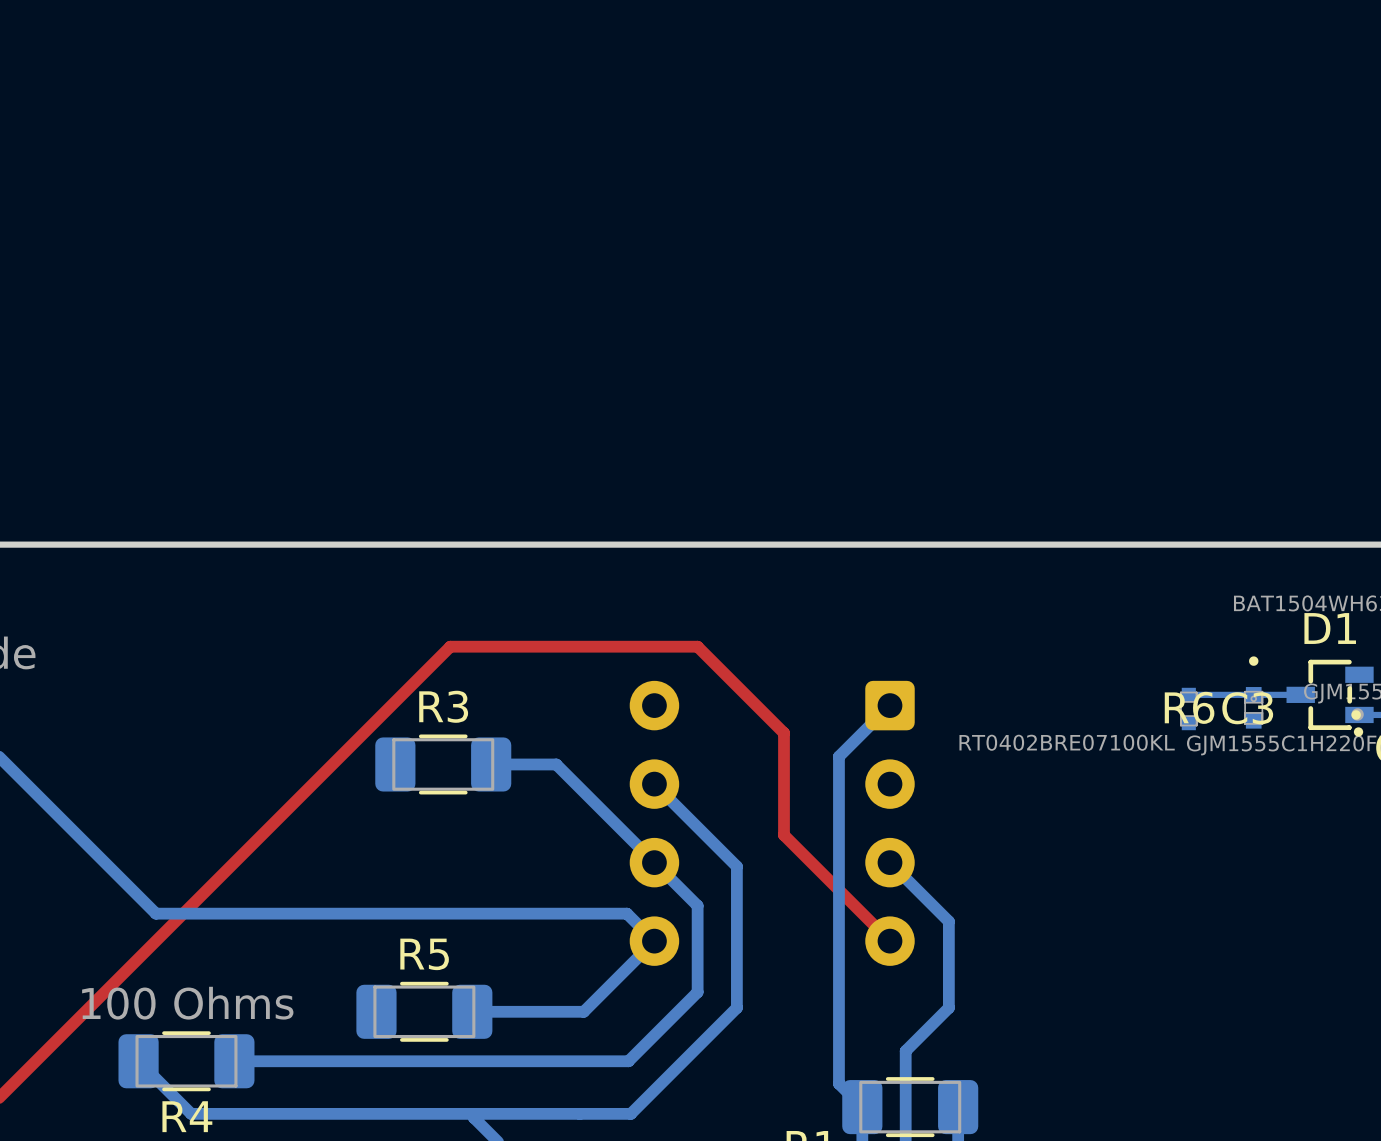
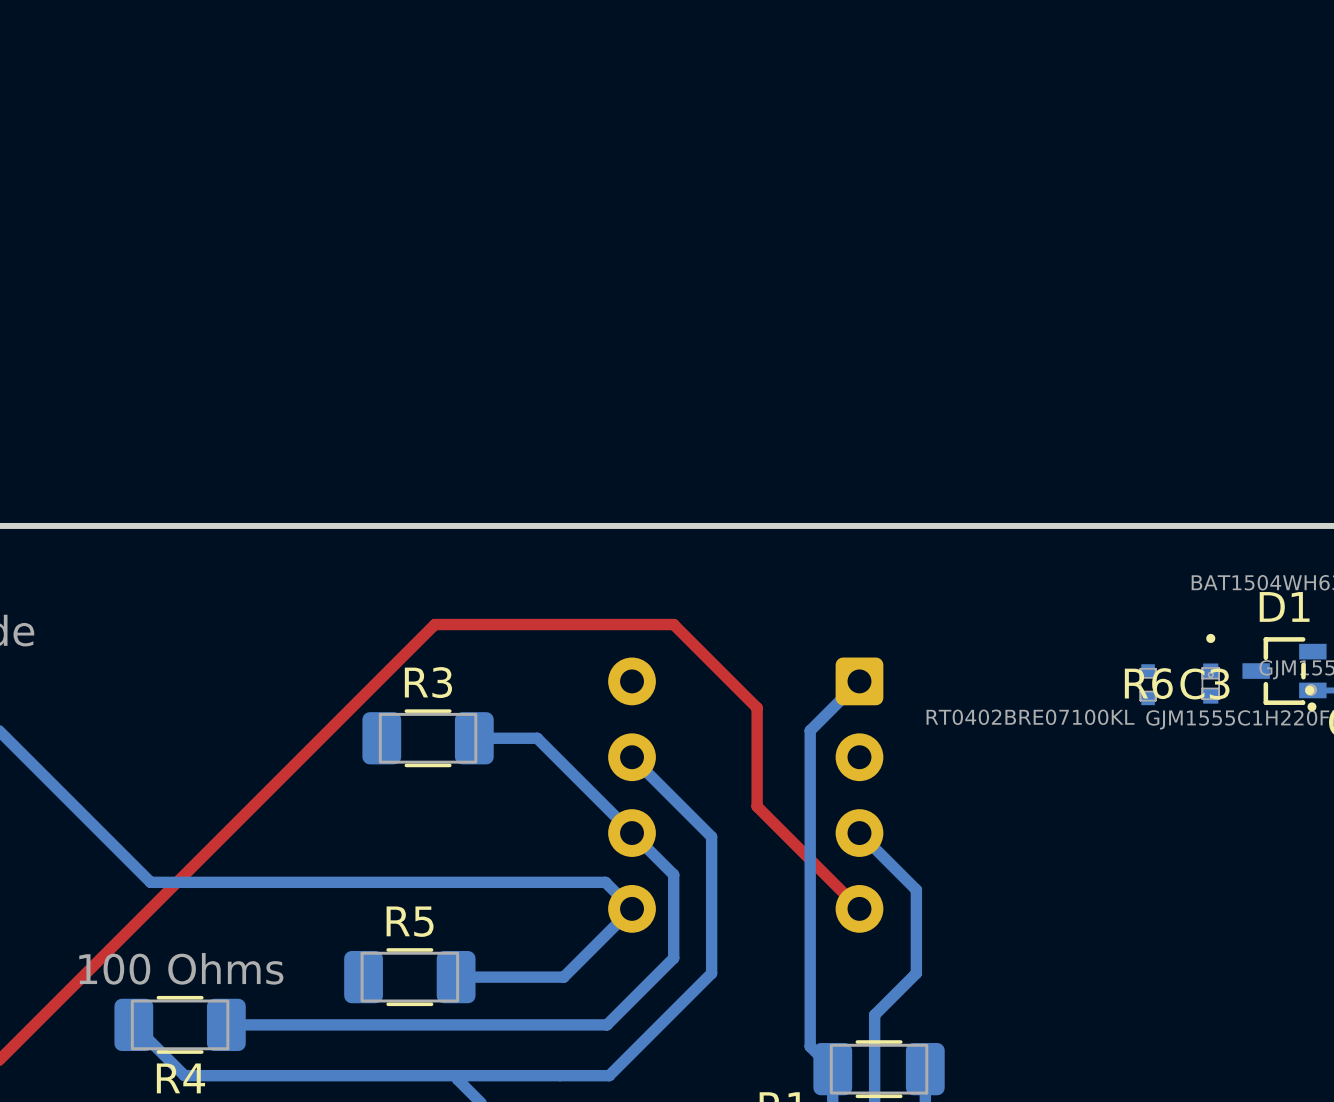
bottom track: (1300, 694) (1188, 694) -> none

